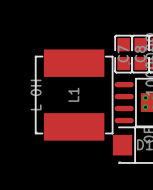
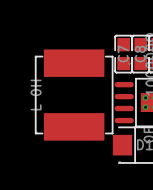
L1 name: L1 (73, 94) -> none

